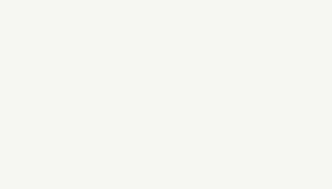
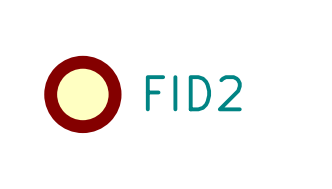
FID2: none -> (82, 94)

